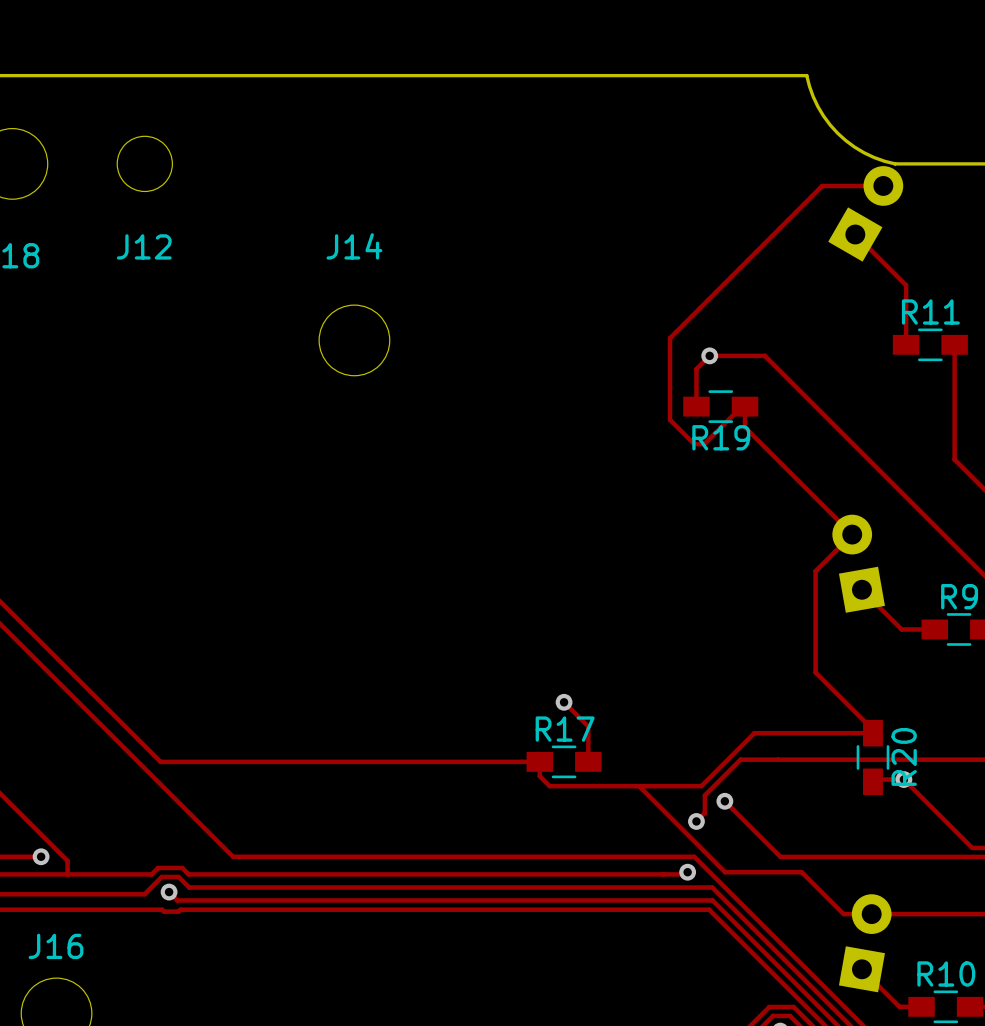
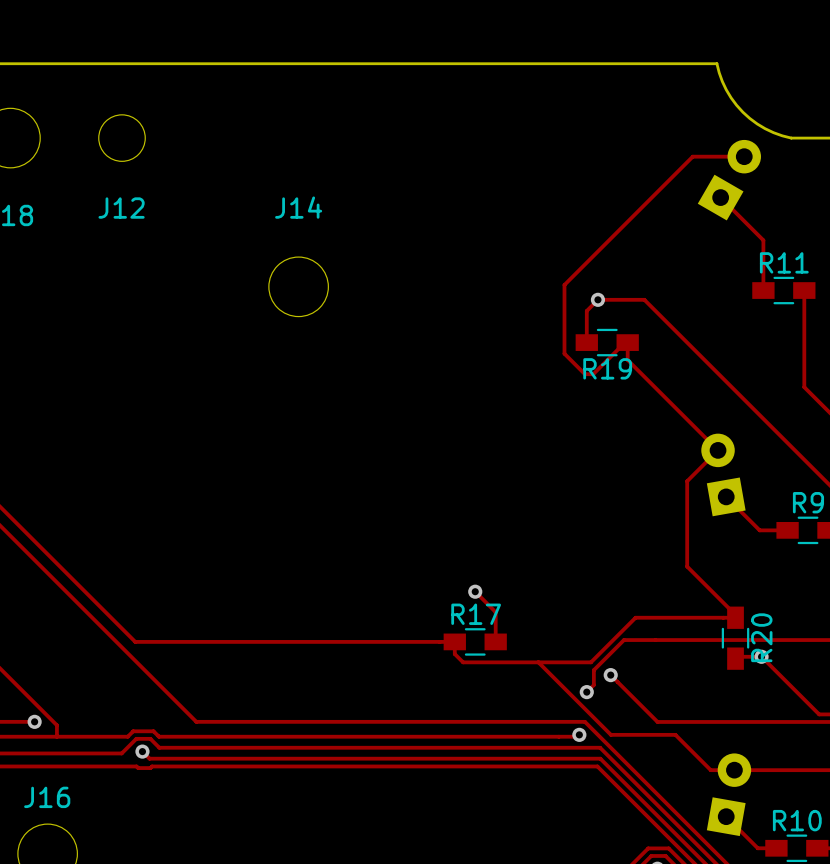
board edge: (806, 75) (813, 96) (823, 116) (837, 133) (854, 147) (874, 157) (895, 163) (939, 163) -> (679, 63) (716, 63) (726, 89) (742, 112) (765, 128) (791, 138)

